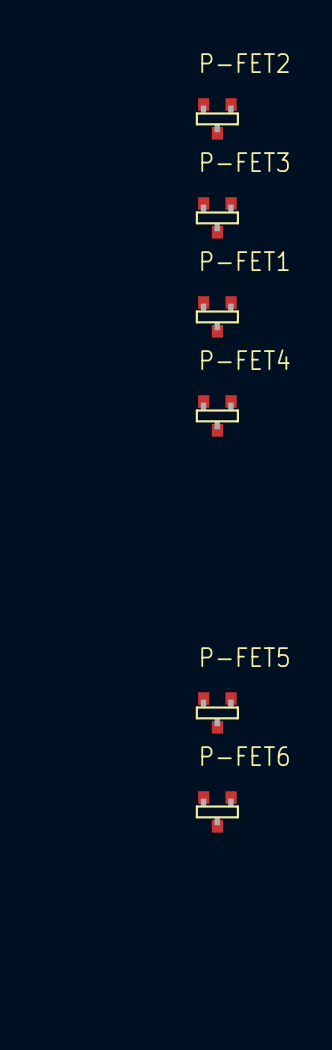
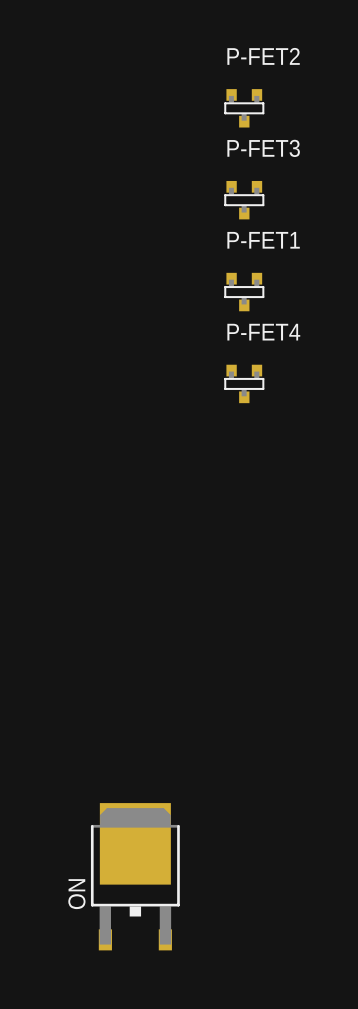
P-FET5: (217, 712) -> none
P-FET6: (217, 811) -> none
ON: none -> (135, 876)

